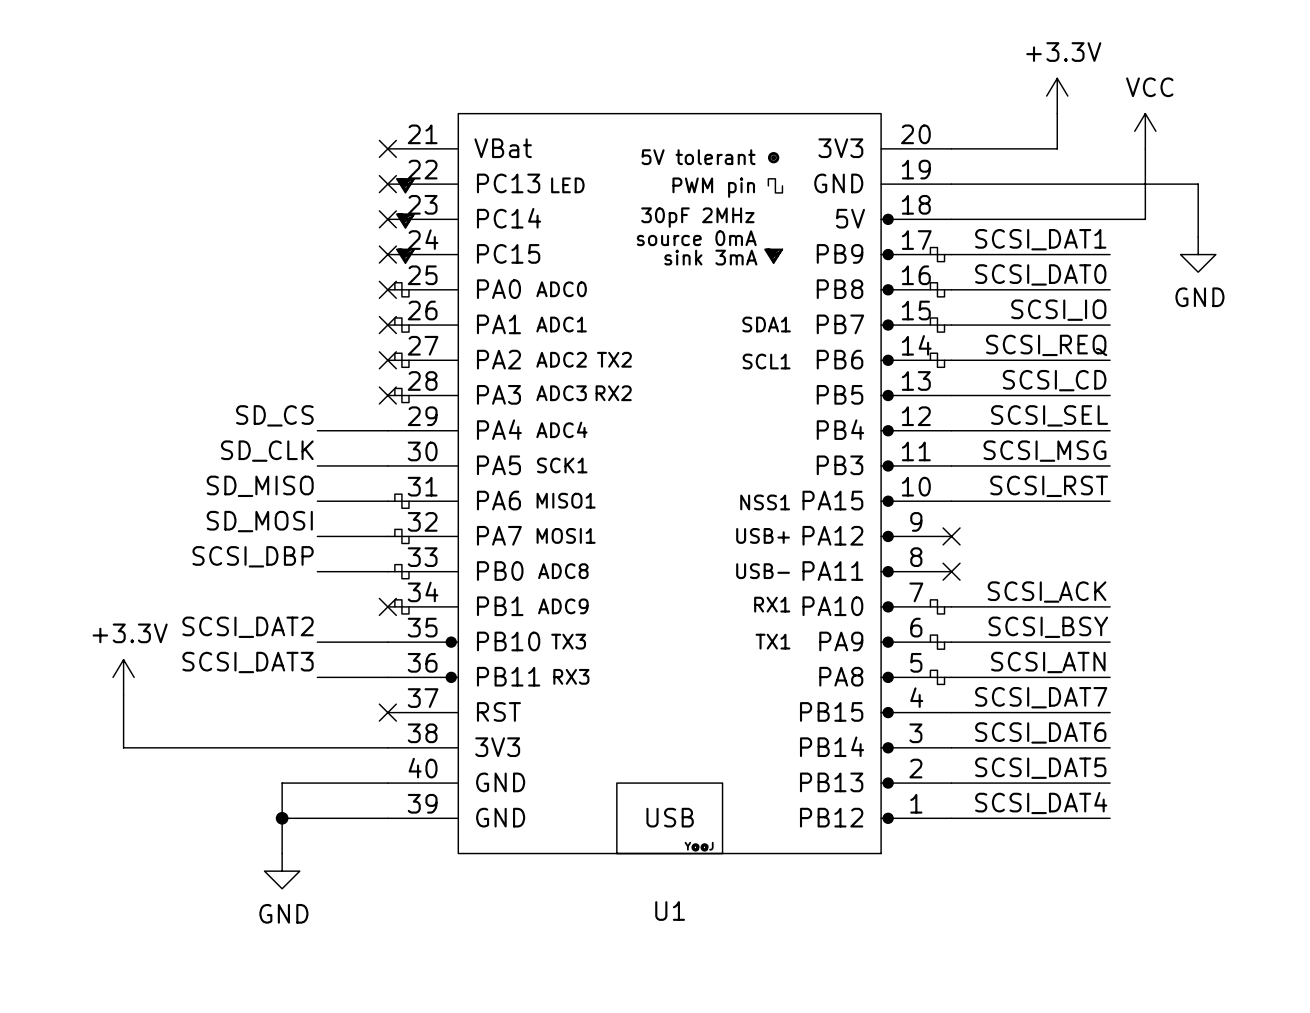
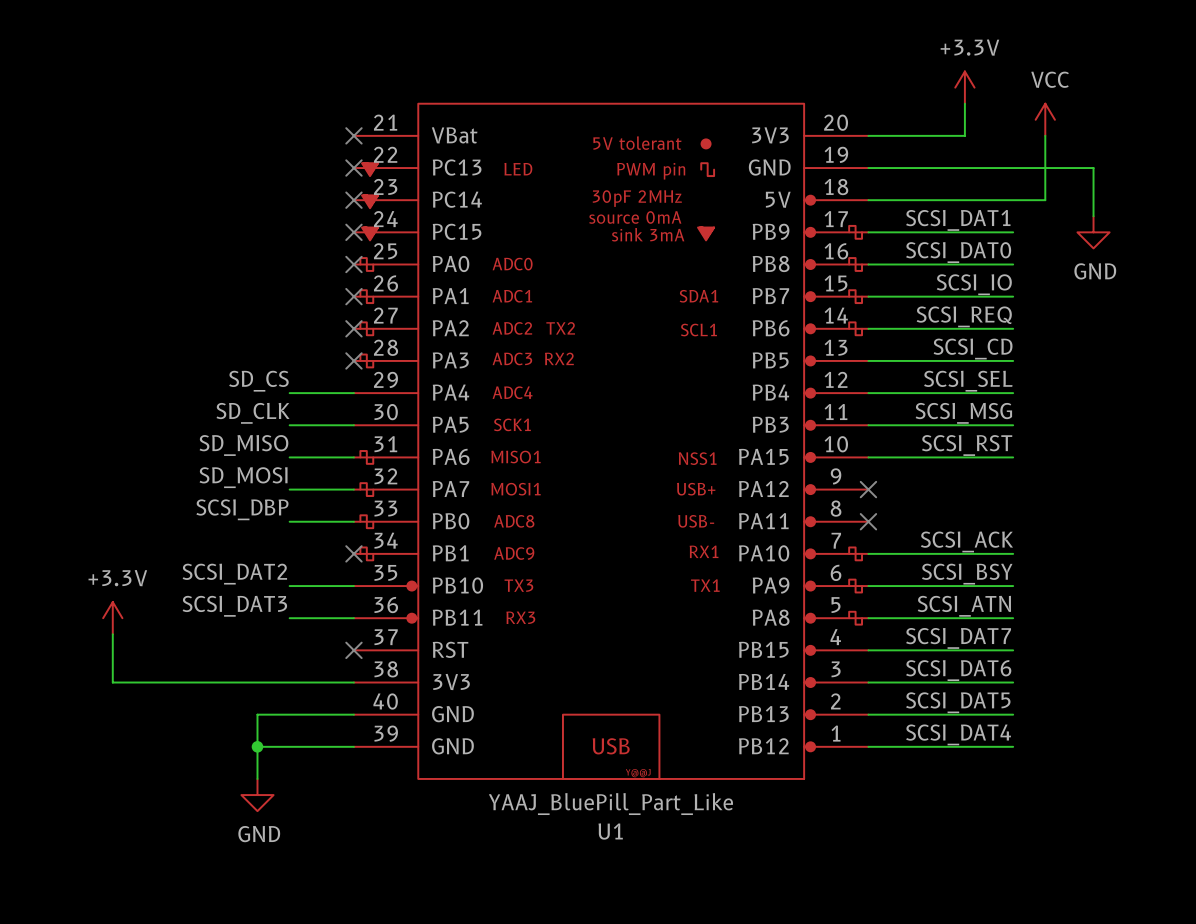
U1 value: none -> YAAJ_BluePill_Part_Like (610, 804)

